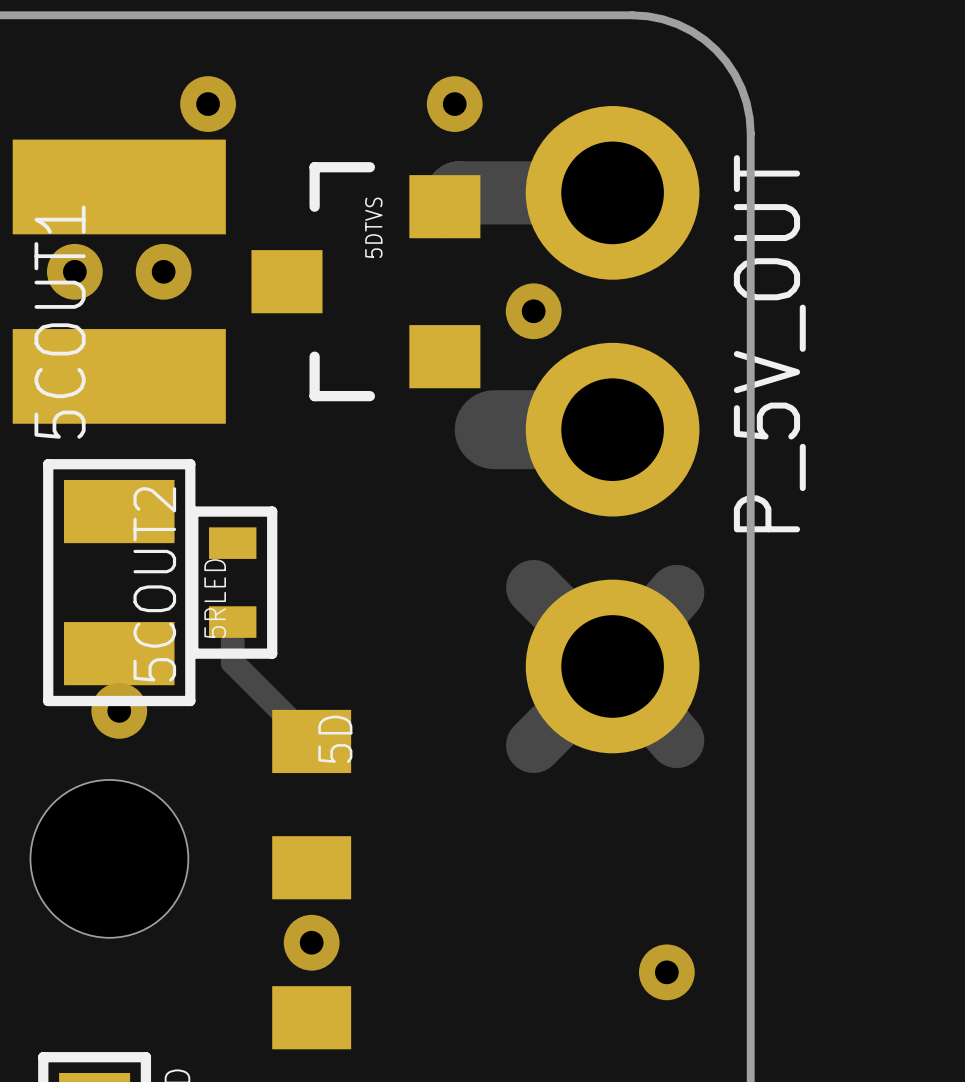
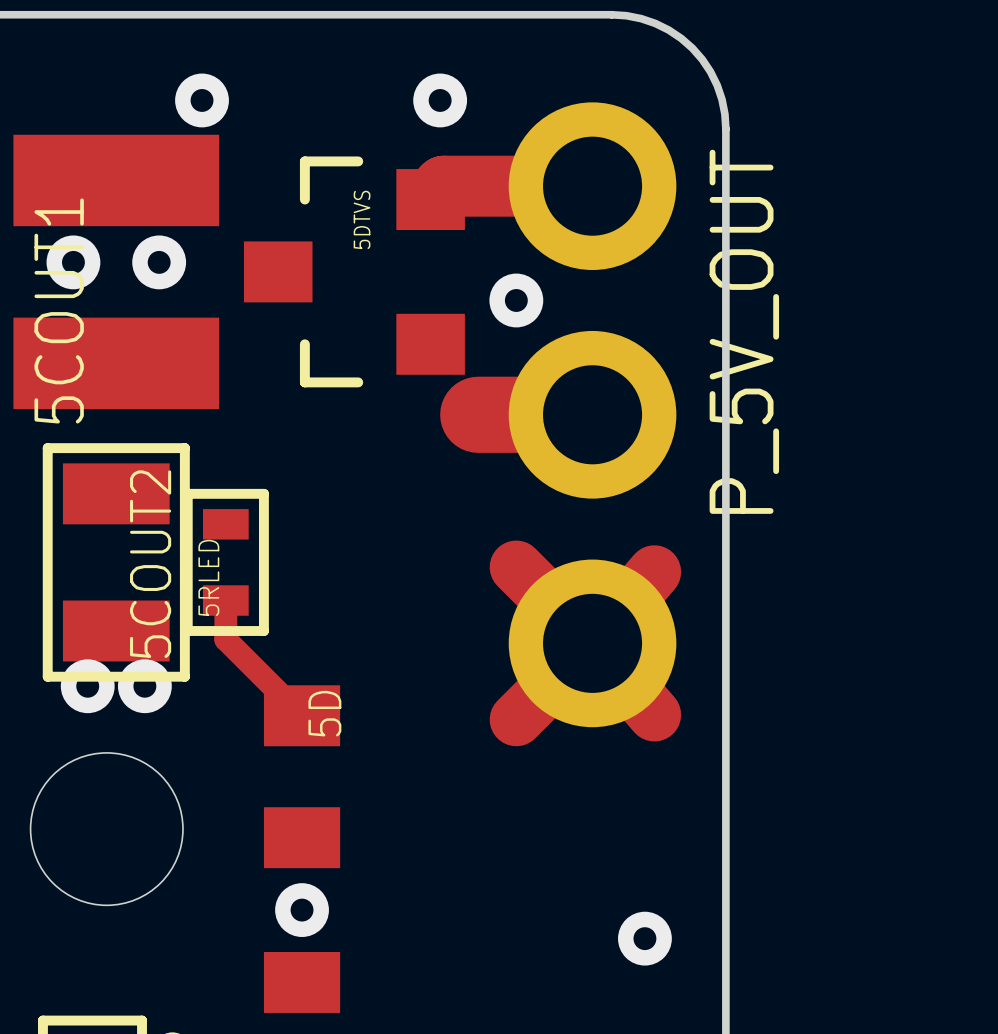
via: none -> (87, 686)
via: (119, 710) -> none
via: none -> (144, 686)

